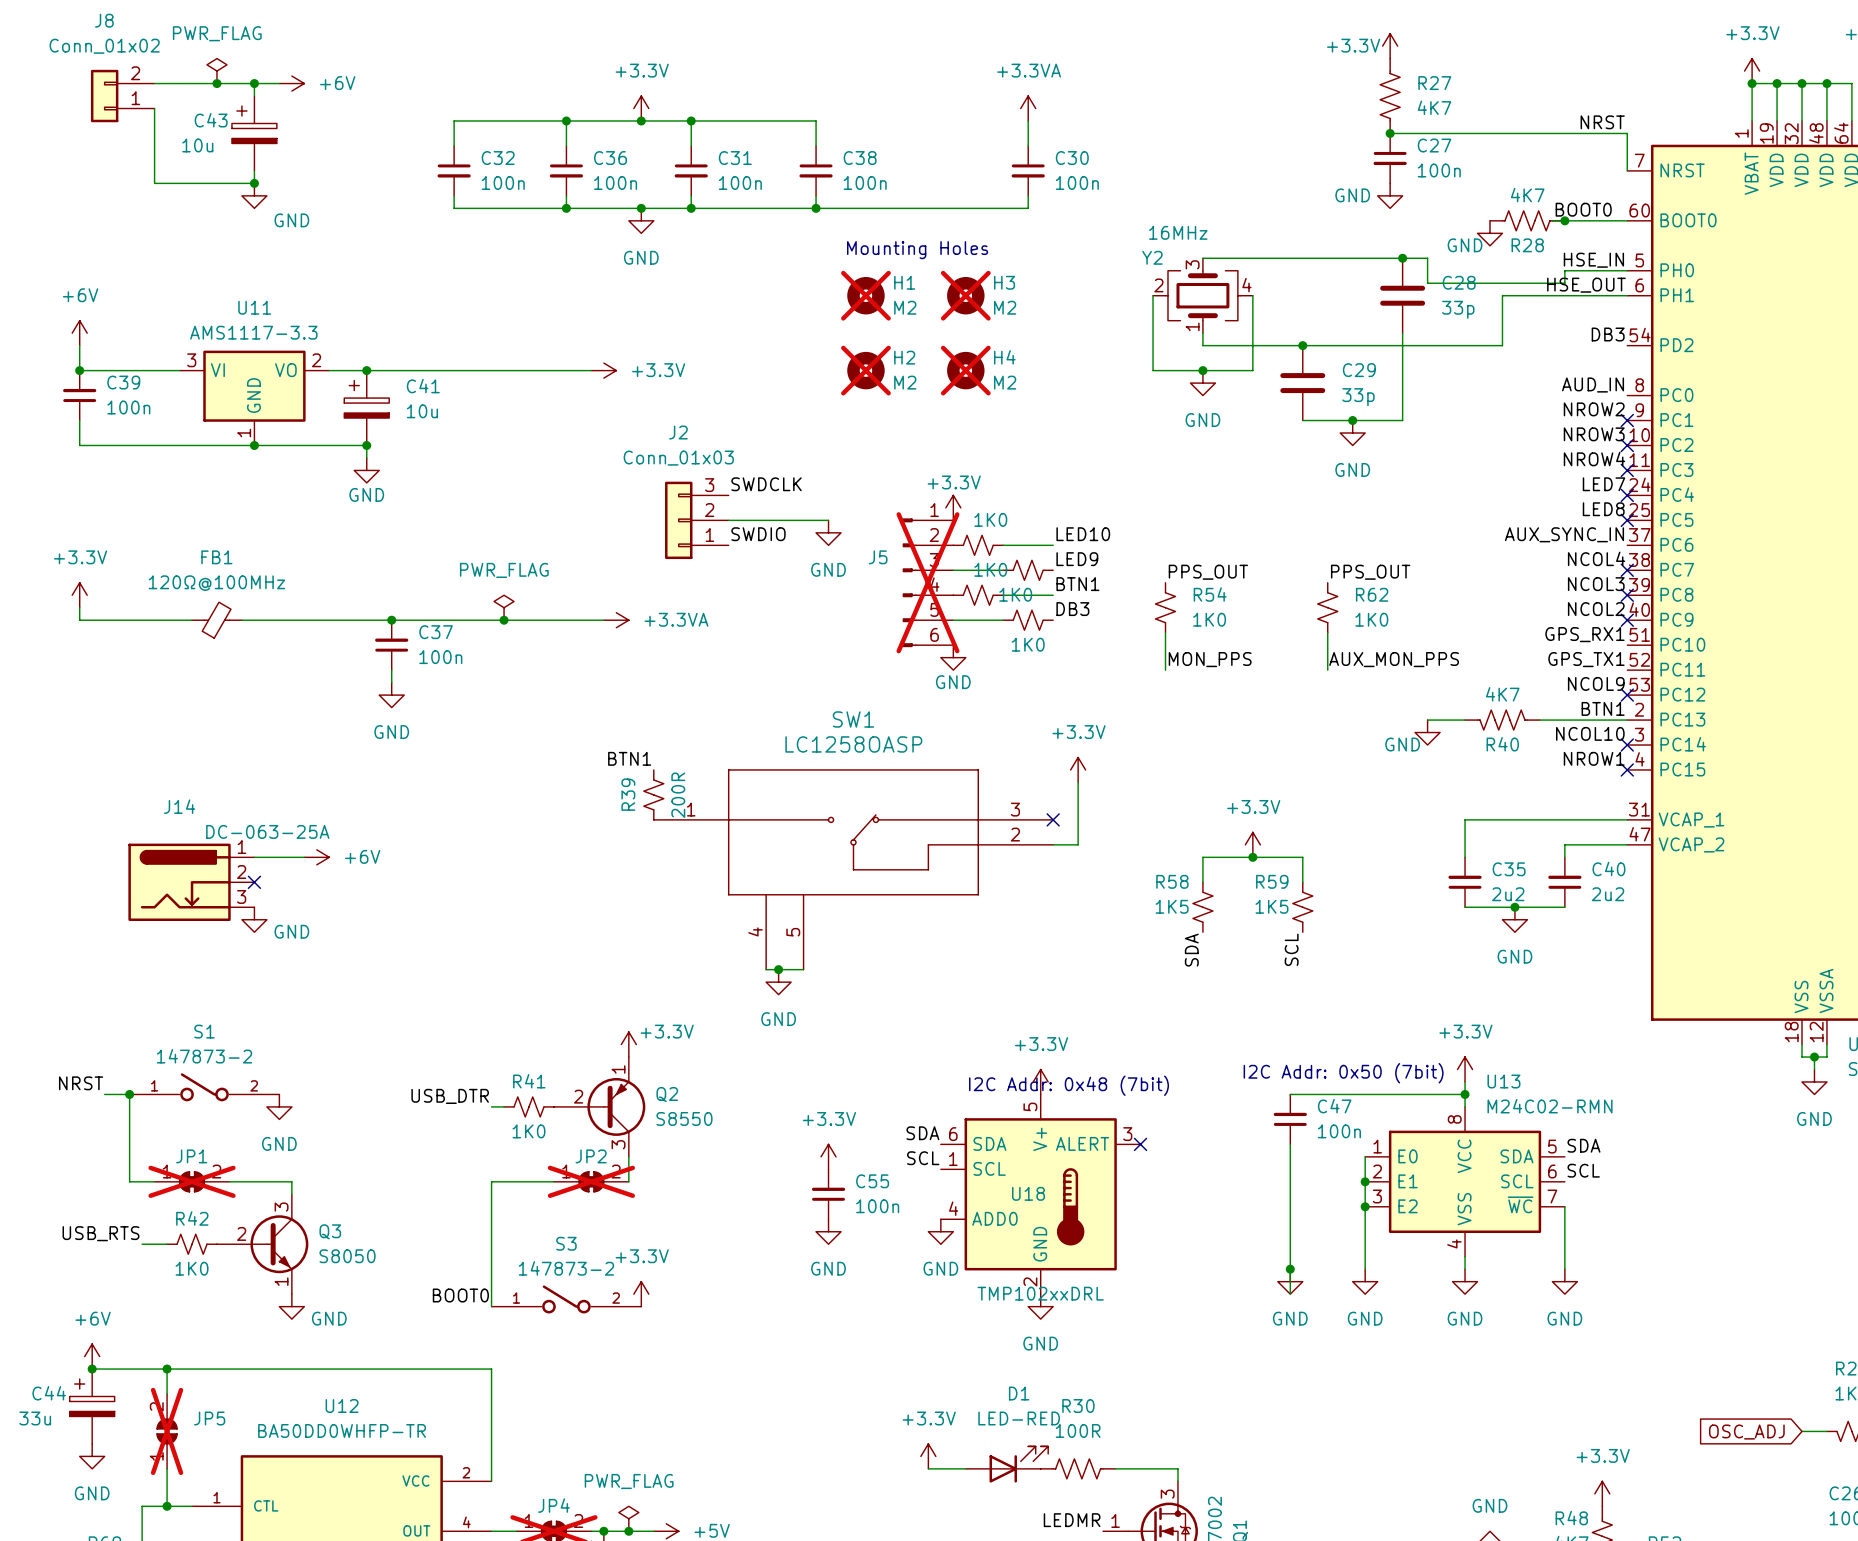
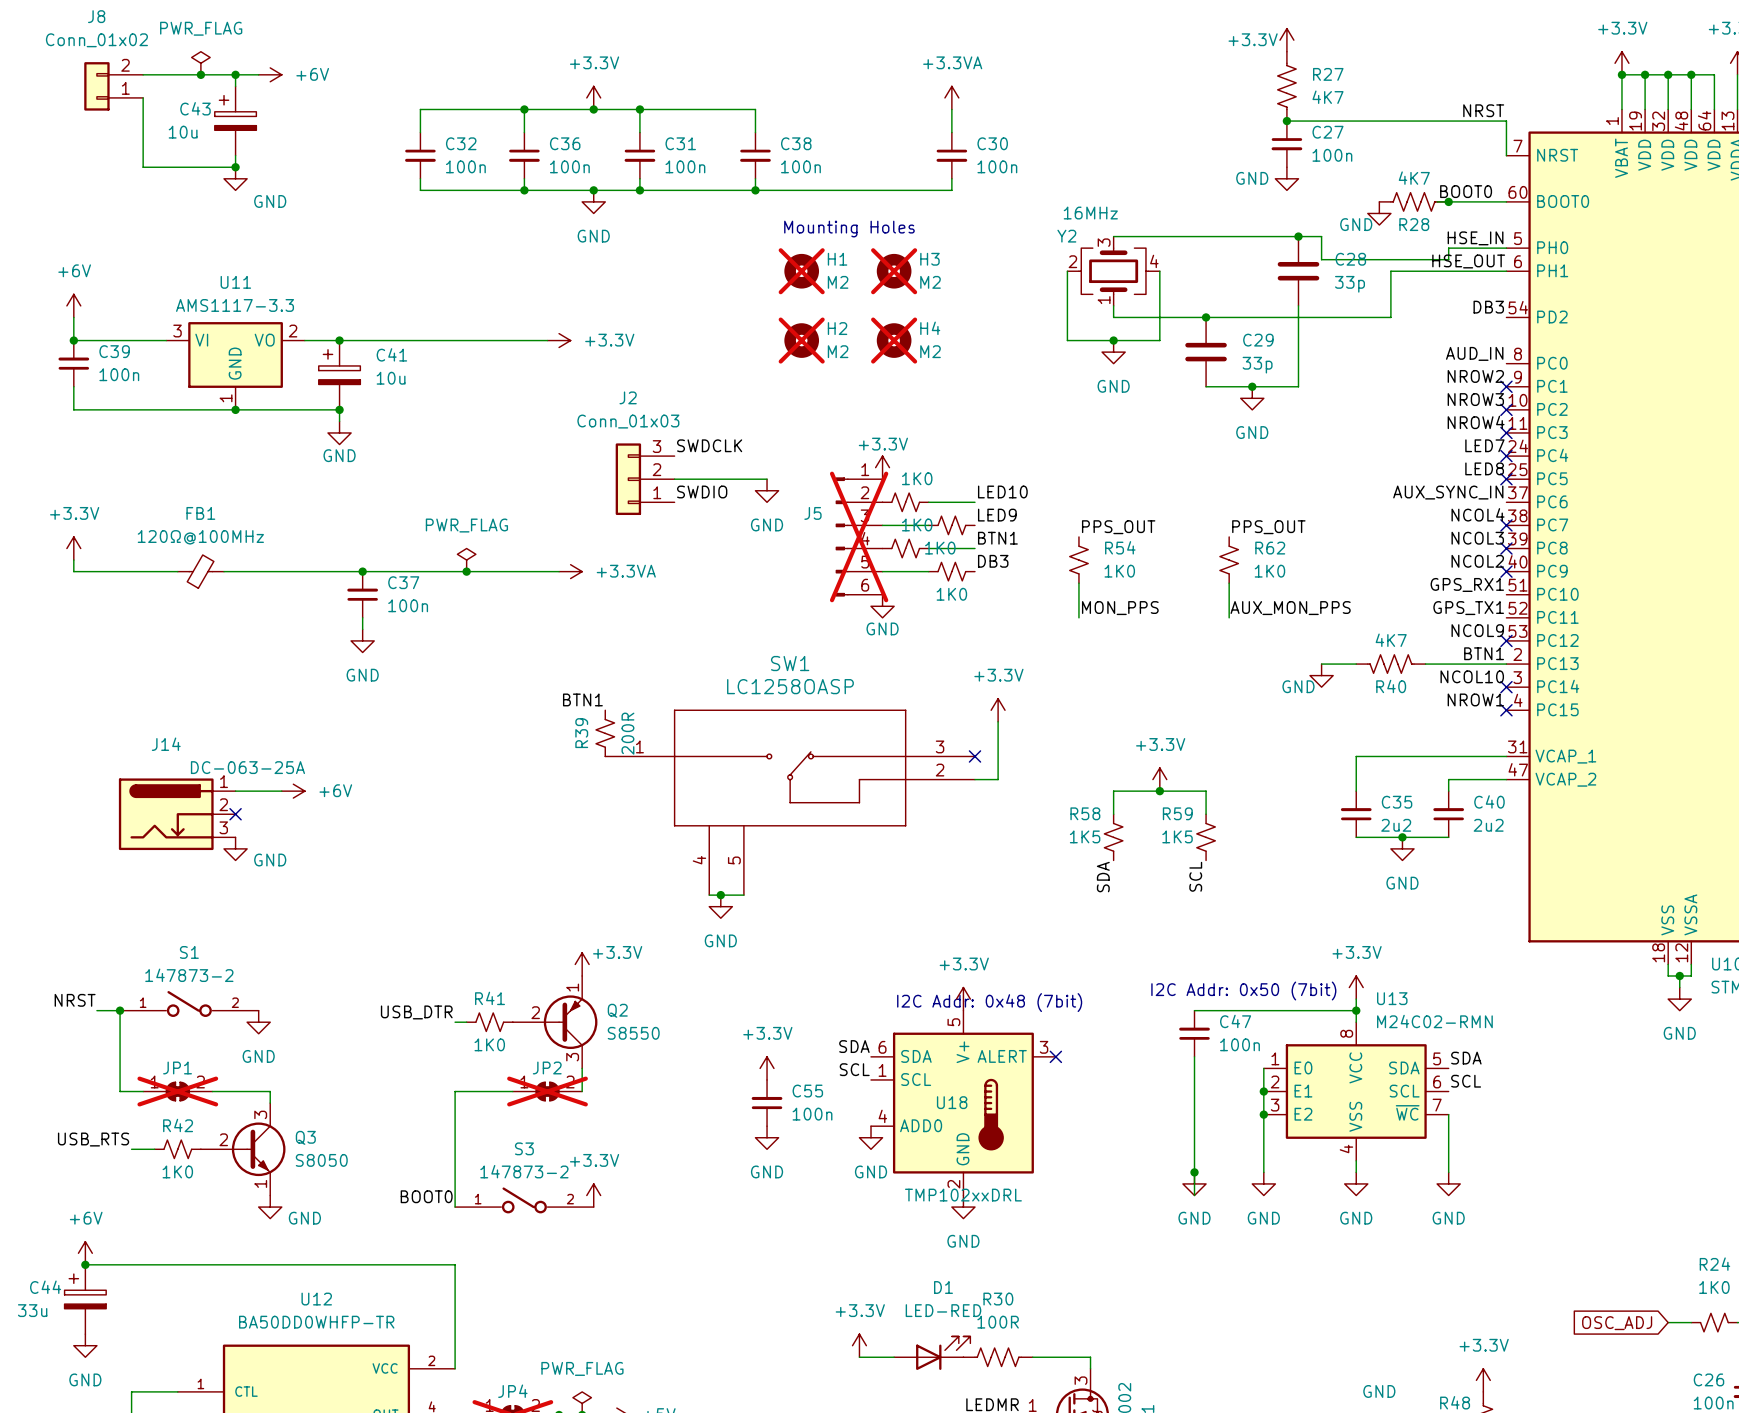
wire: (167, 1369) (167, 1394) -> none
junction: (167, 1369) -> none
JP5: (167, 1431) -> none
wire: (167, 1468) (167, 1506) -> none
junction: (167, 1506) -> none

